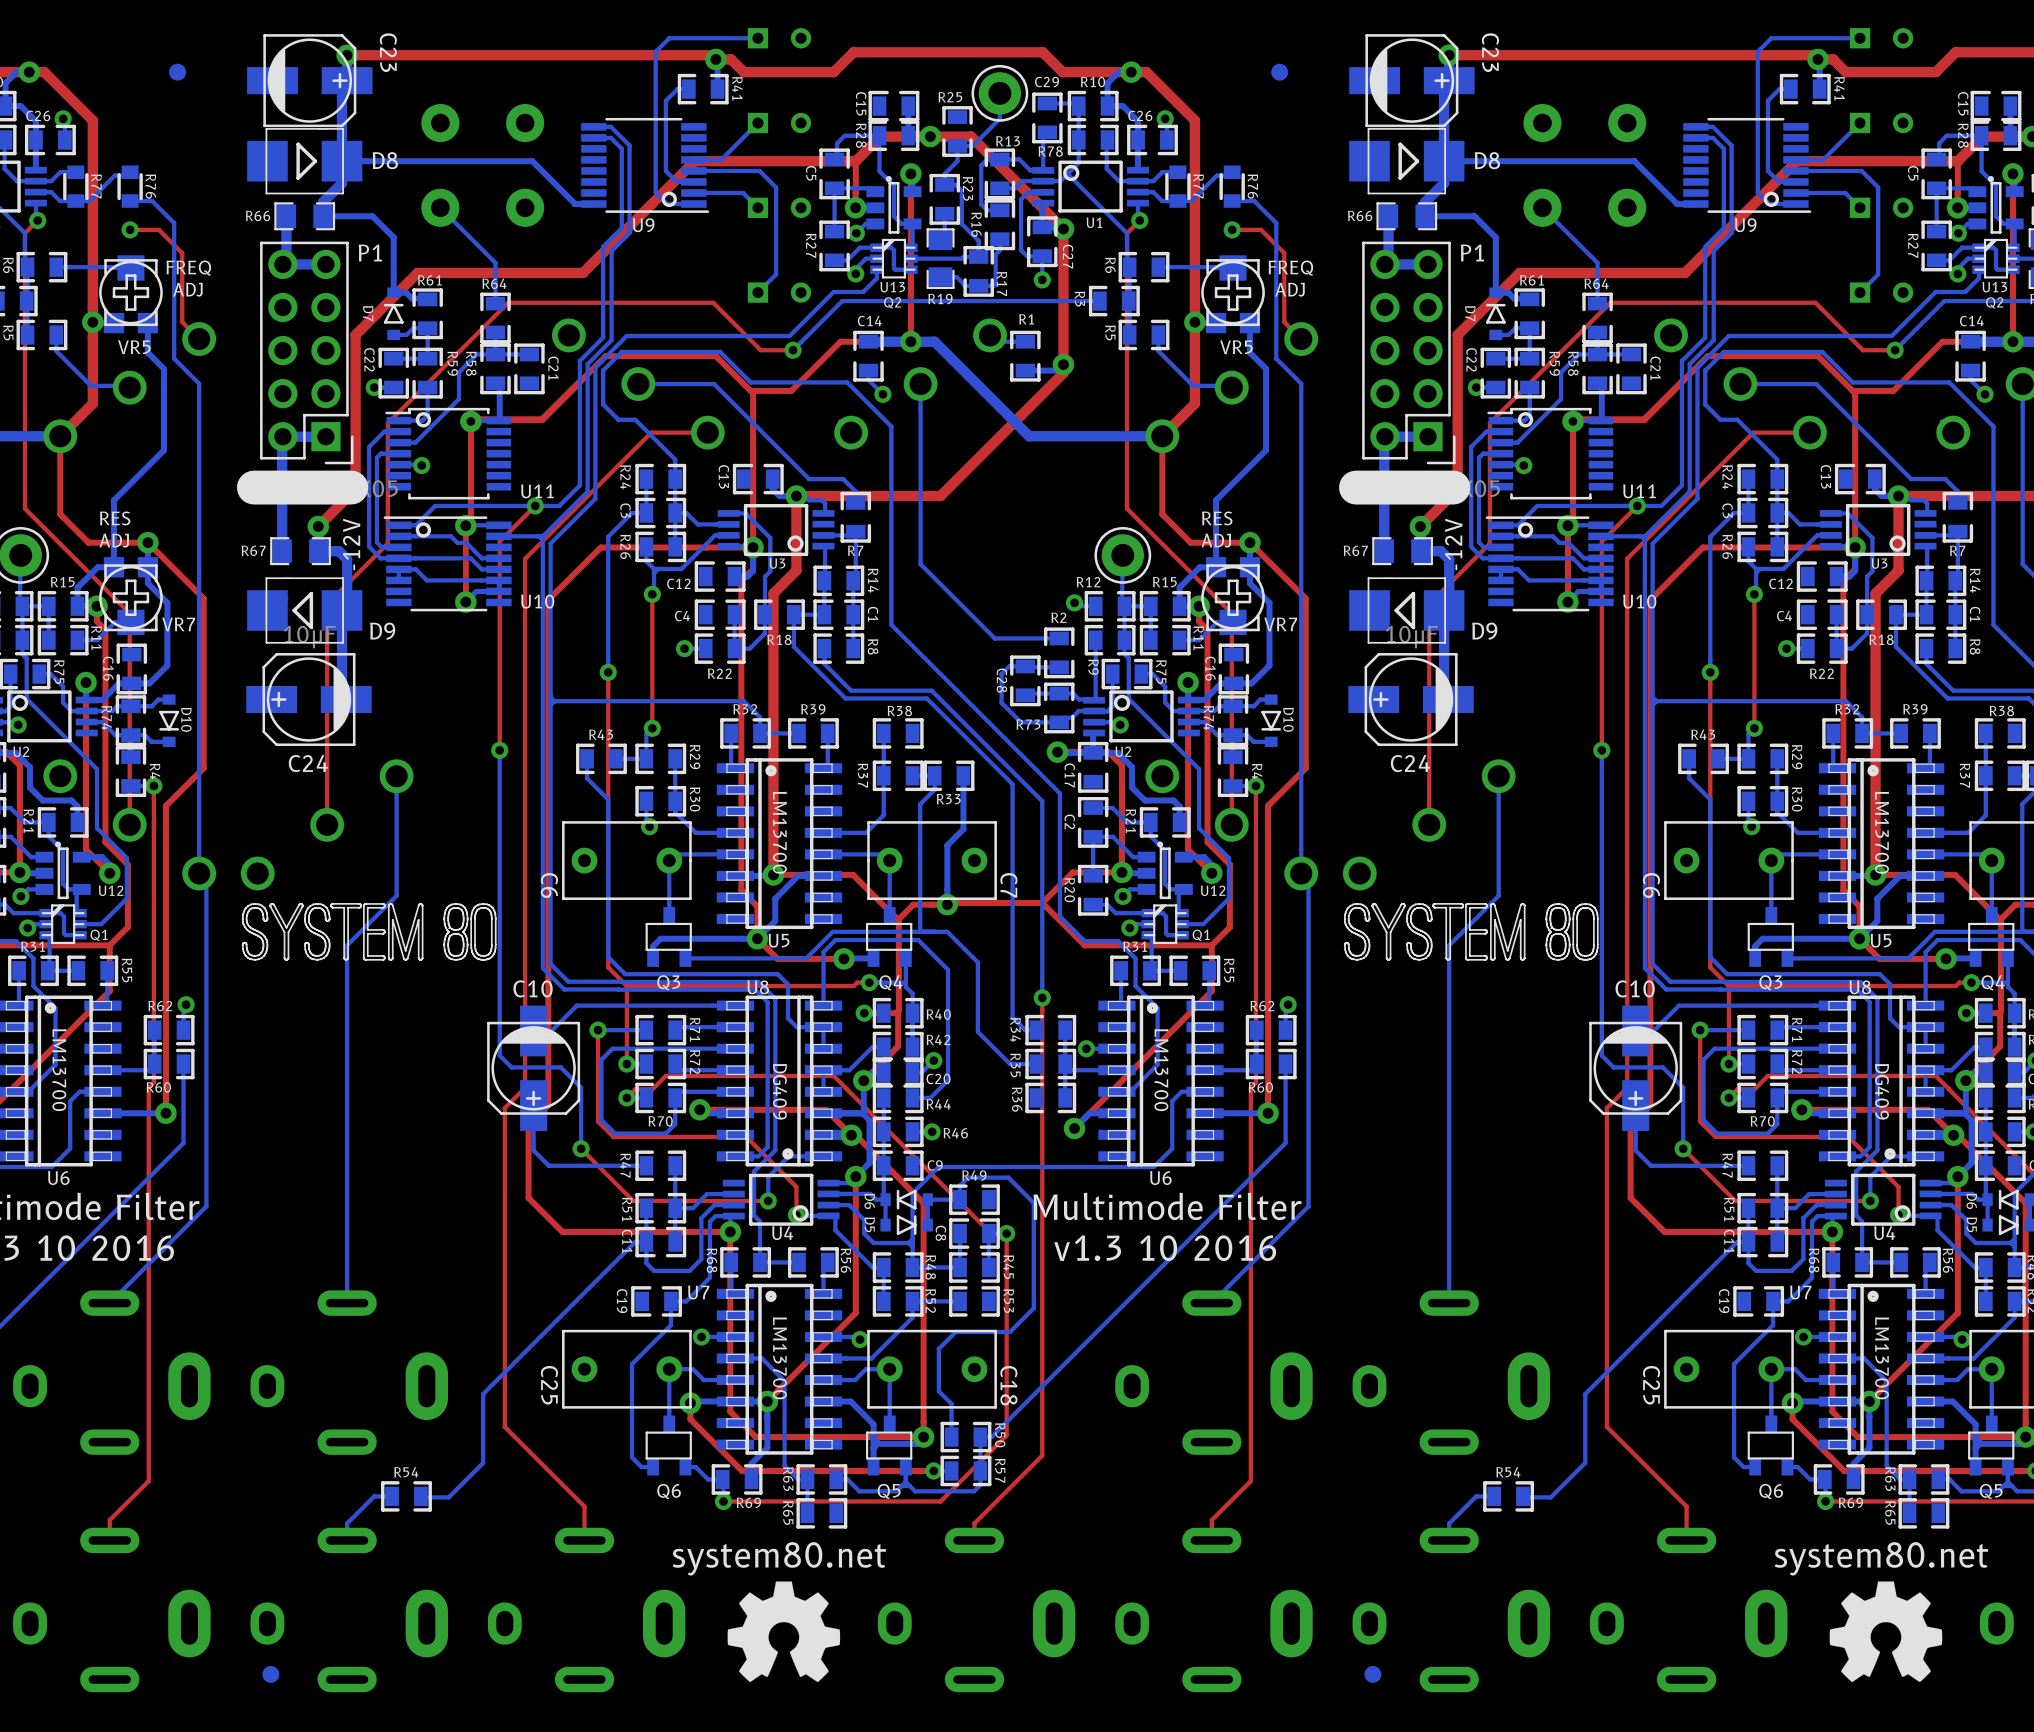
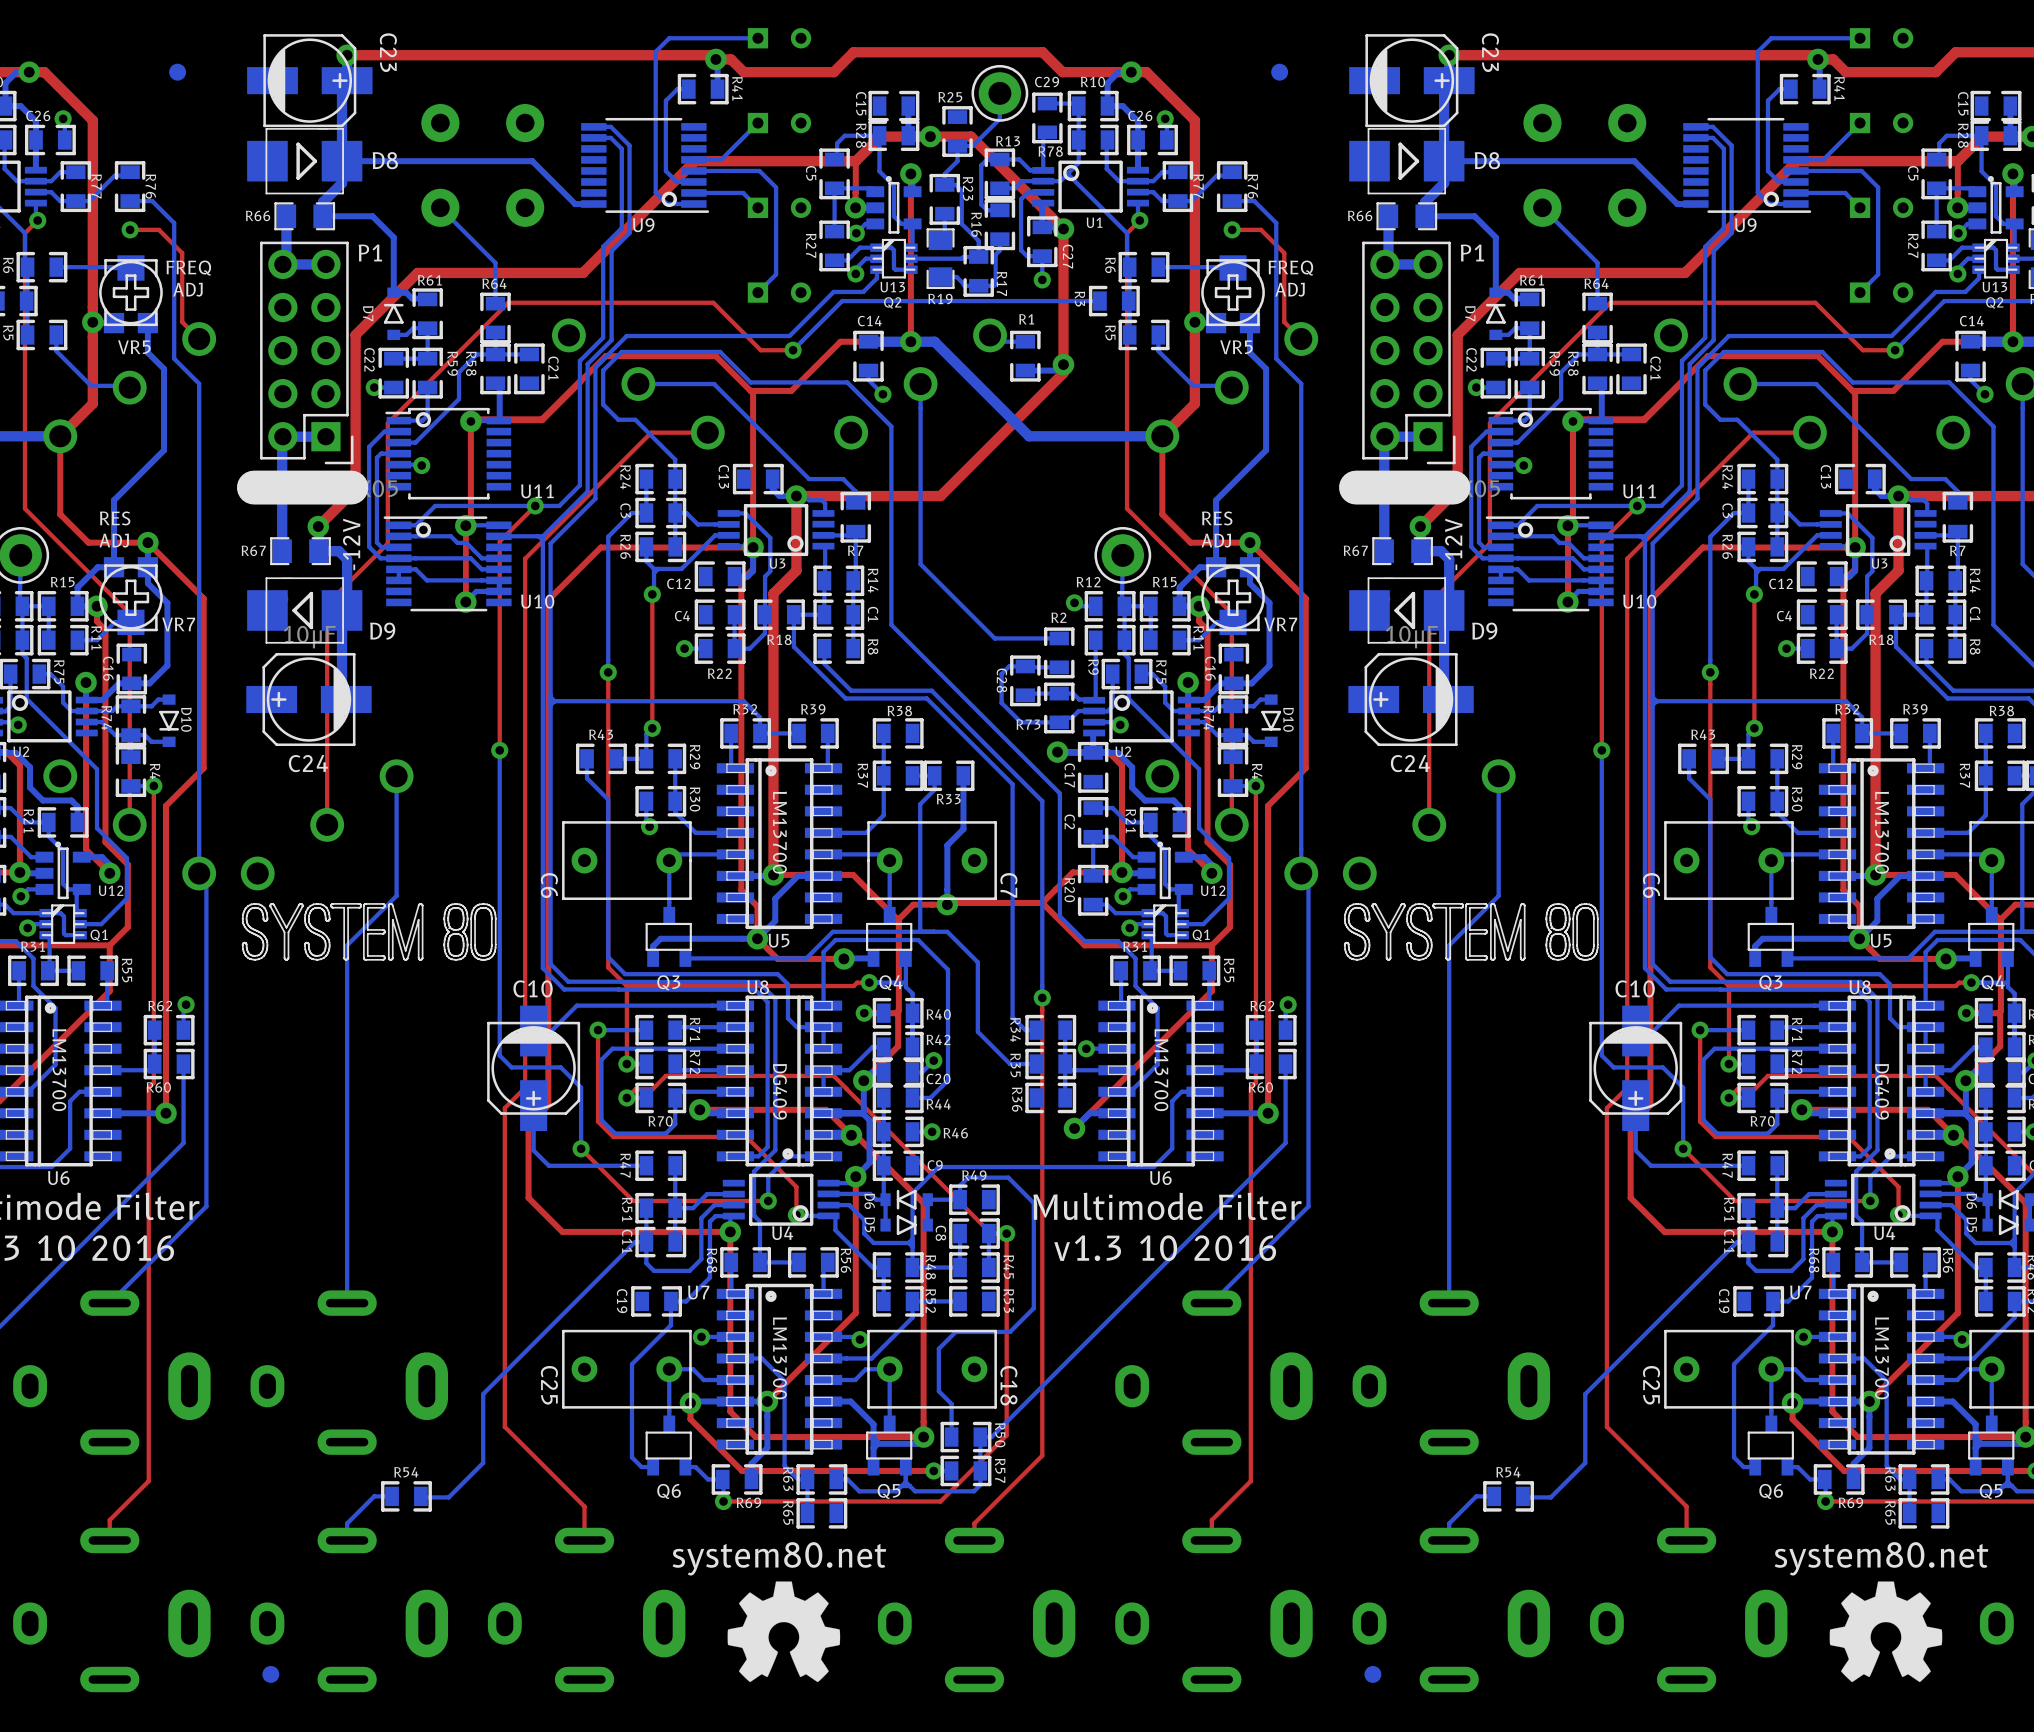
R77 footprint: [63, 165, 89, 208] -> [60, 161, 92, 213]
R76 footprint: [117, 165, 143, 208] -> [114, 161, 146, 213]
R77 footprint: [1165, 165, 1191, 208] -> [1162, 161, 1194, 213]
R76 footprint: [1219, 165, 1245, 208] -> [1216, 161, 1248, 213]

